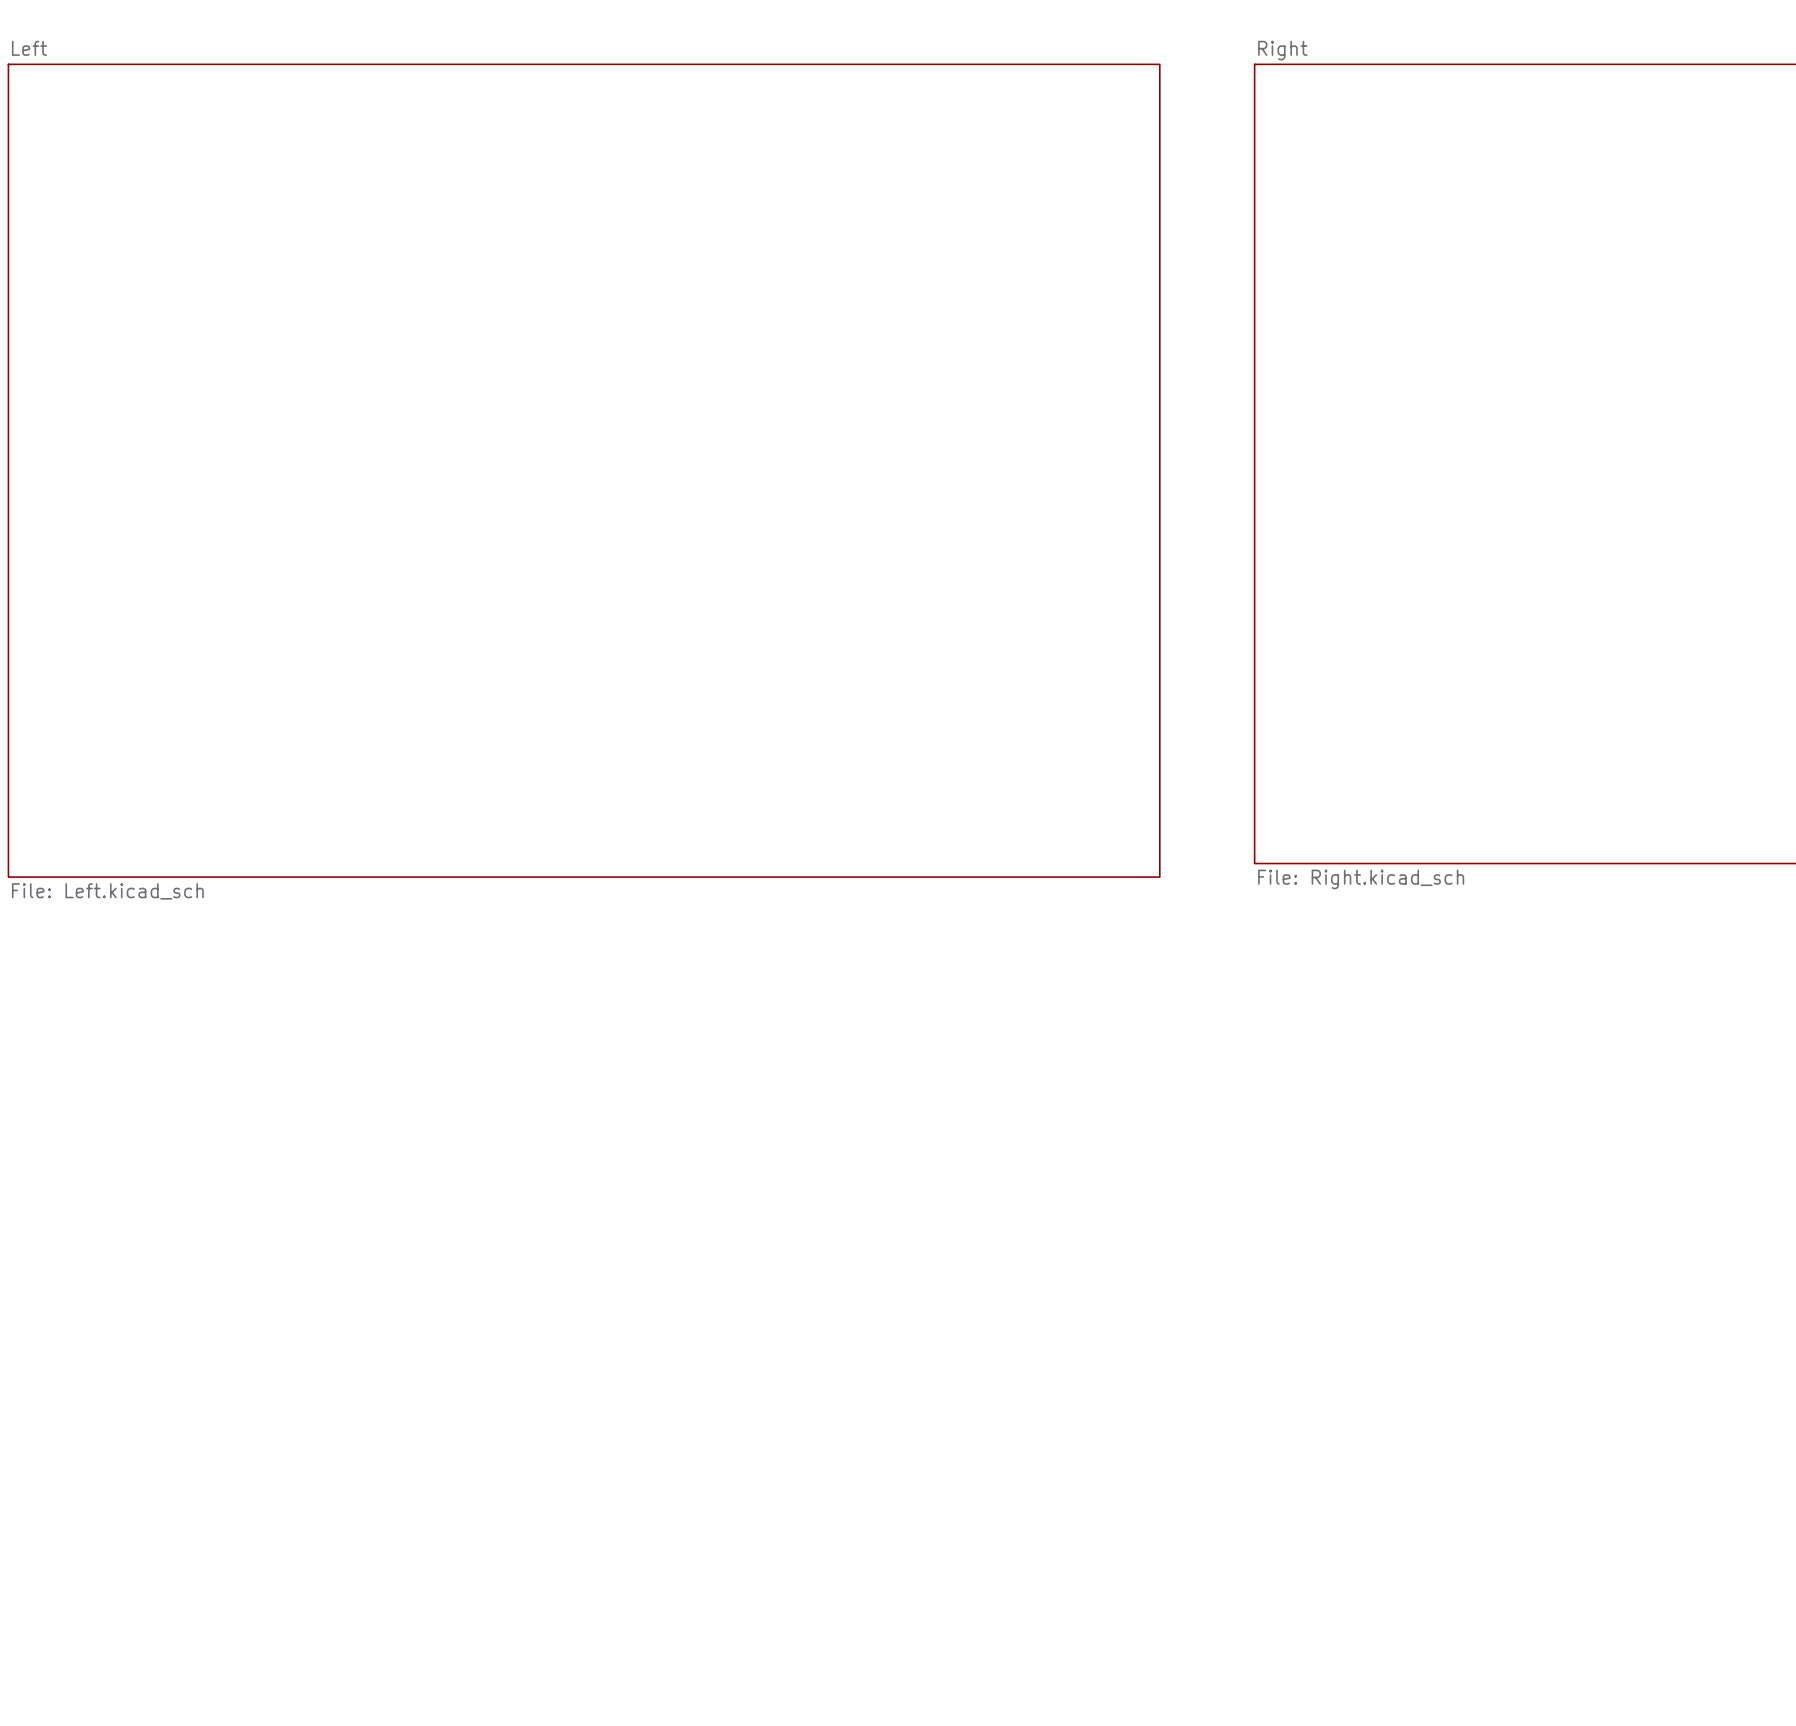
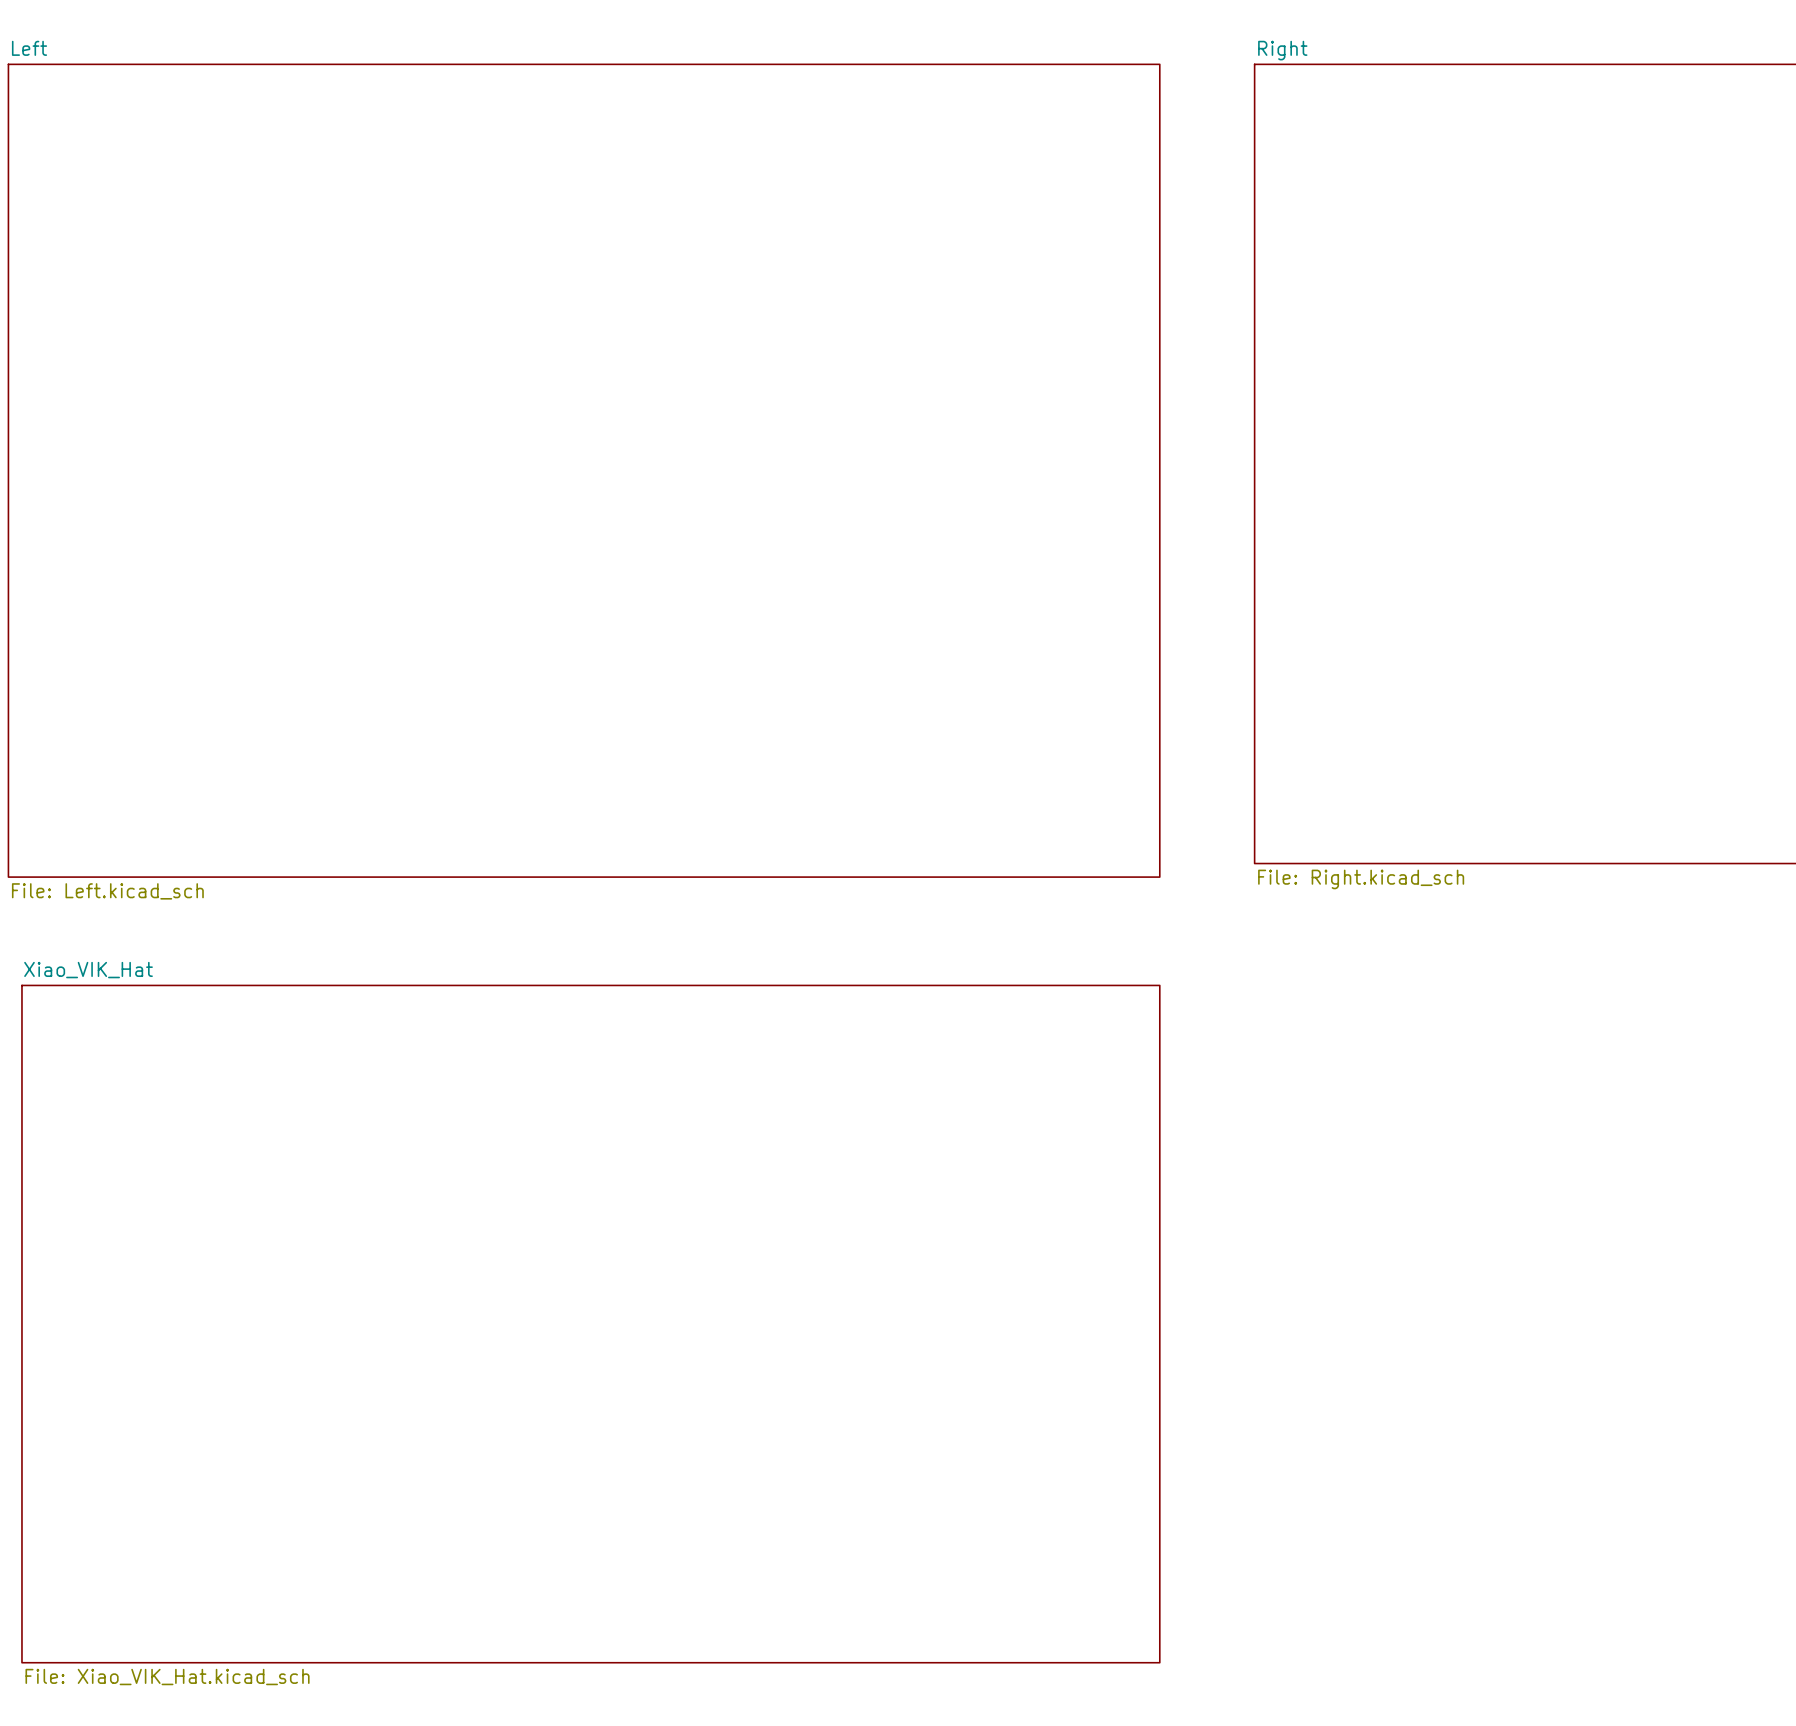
sheet Xiao_VIK_Hat: none -> File: Xiao_VIK_Hat.kicad_sch (590, 1324)

